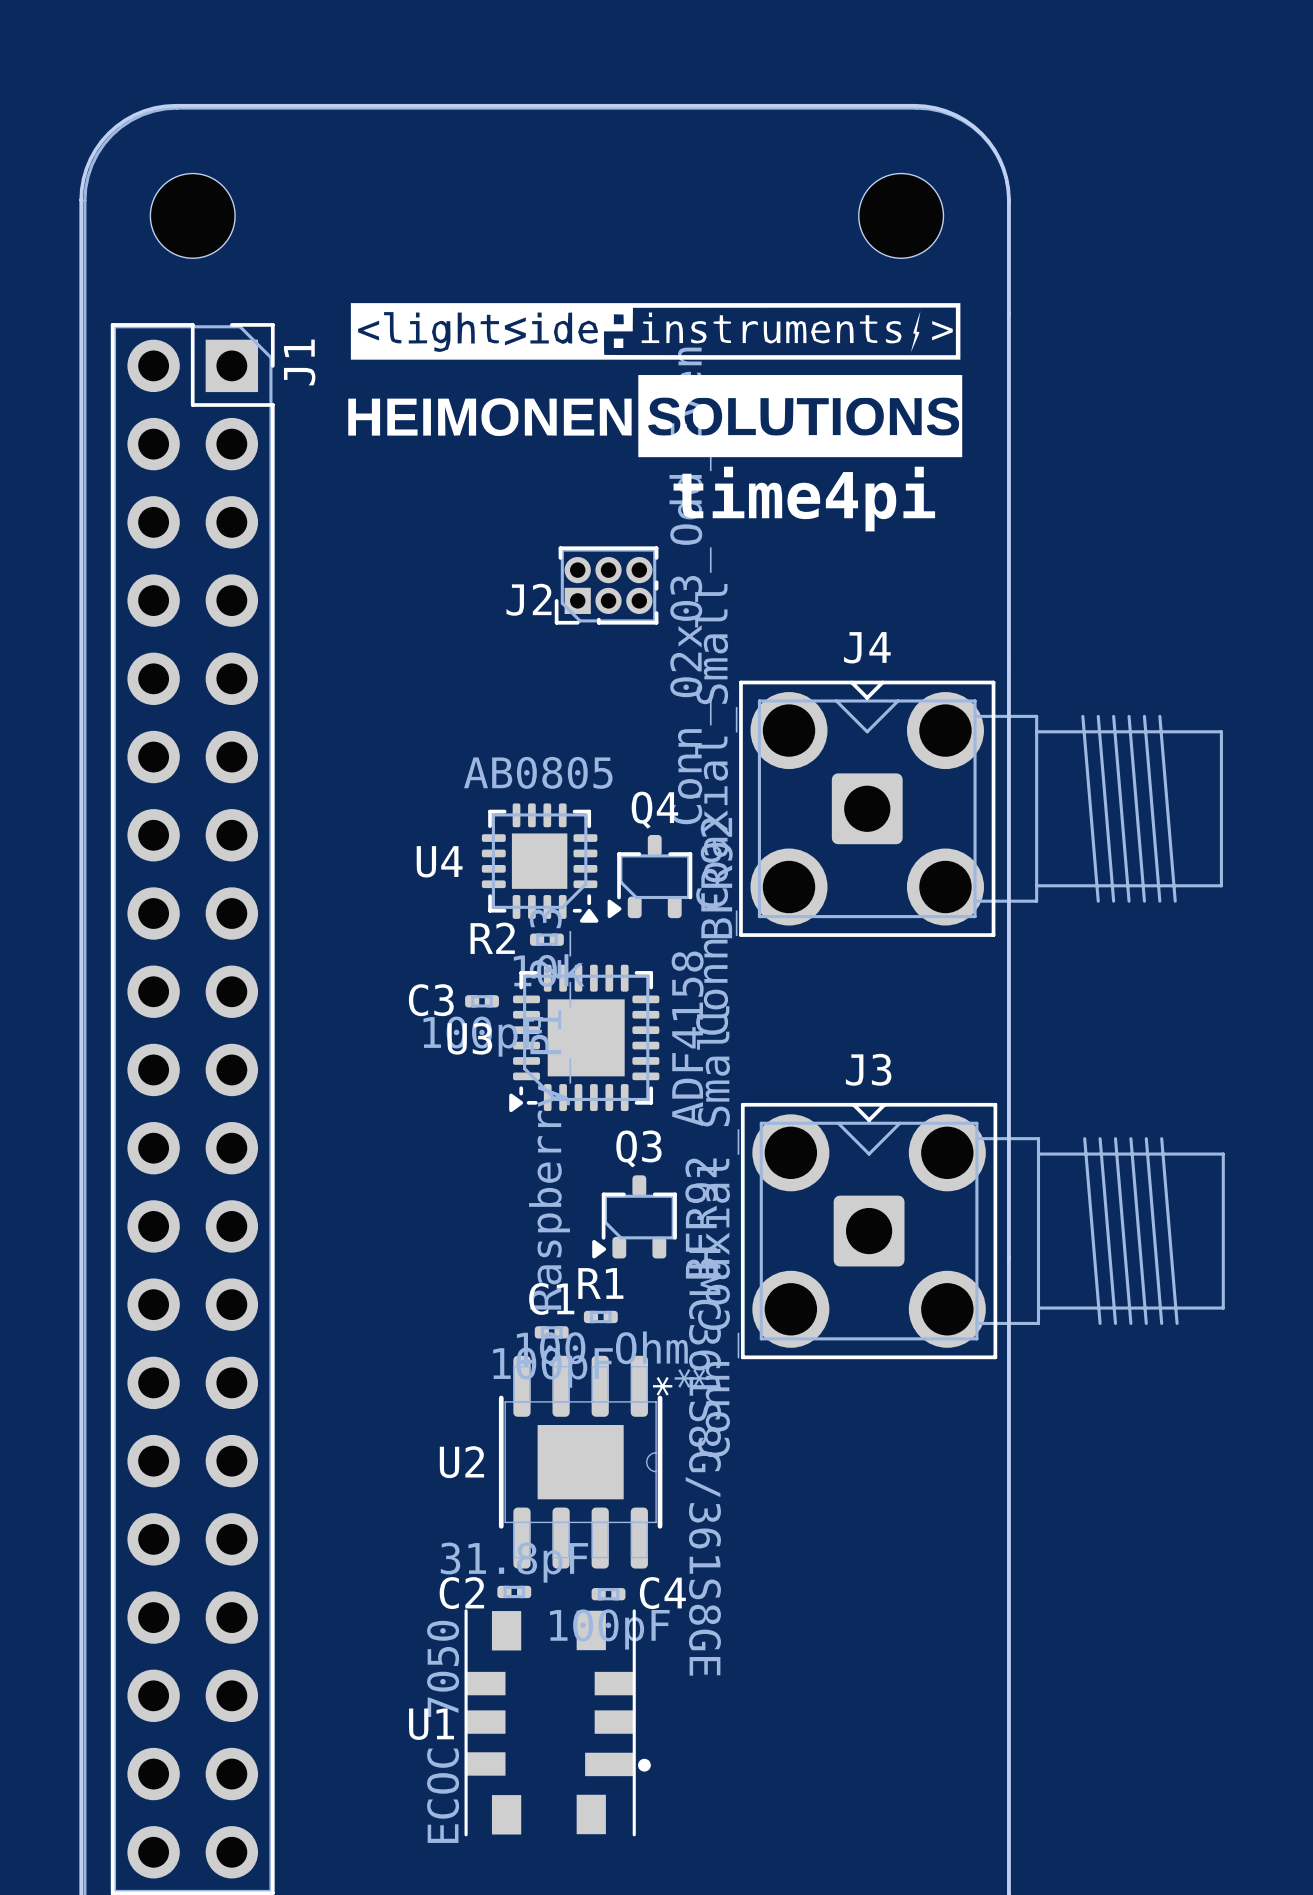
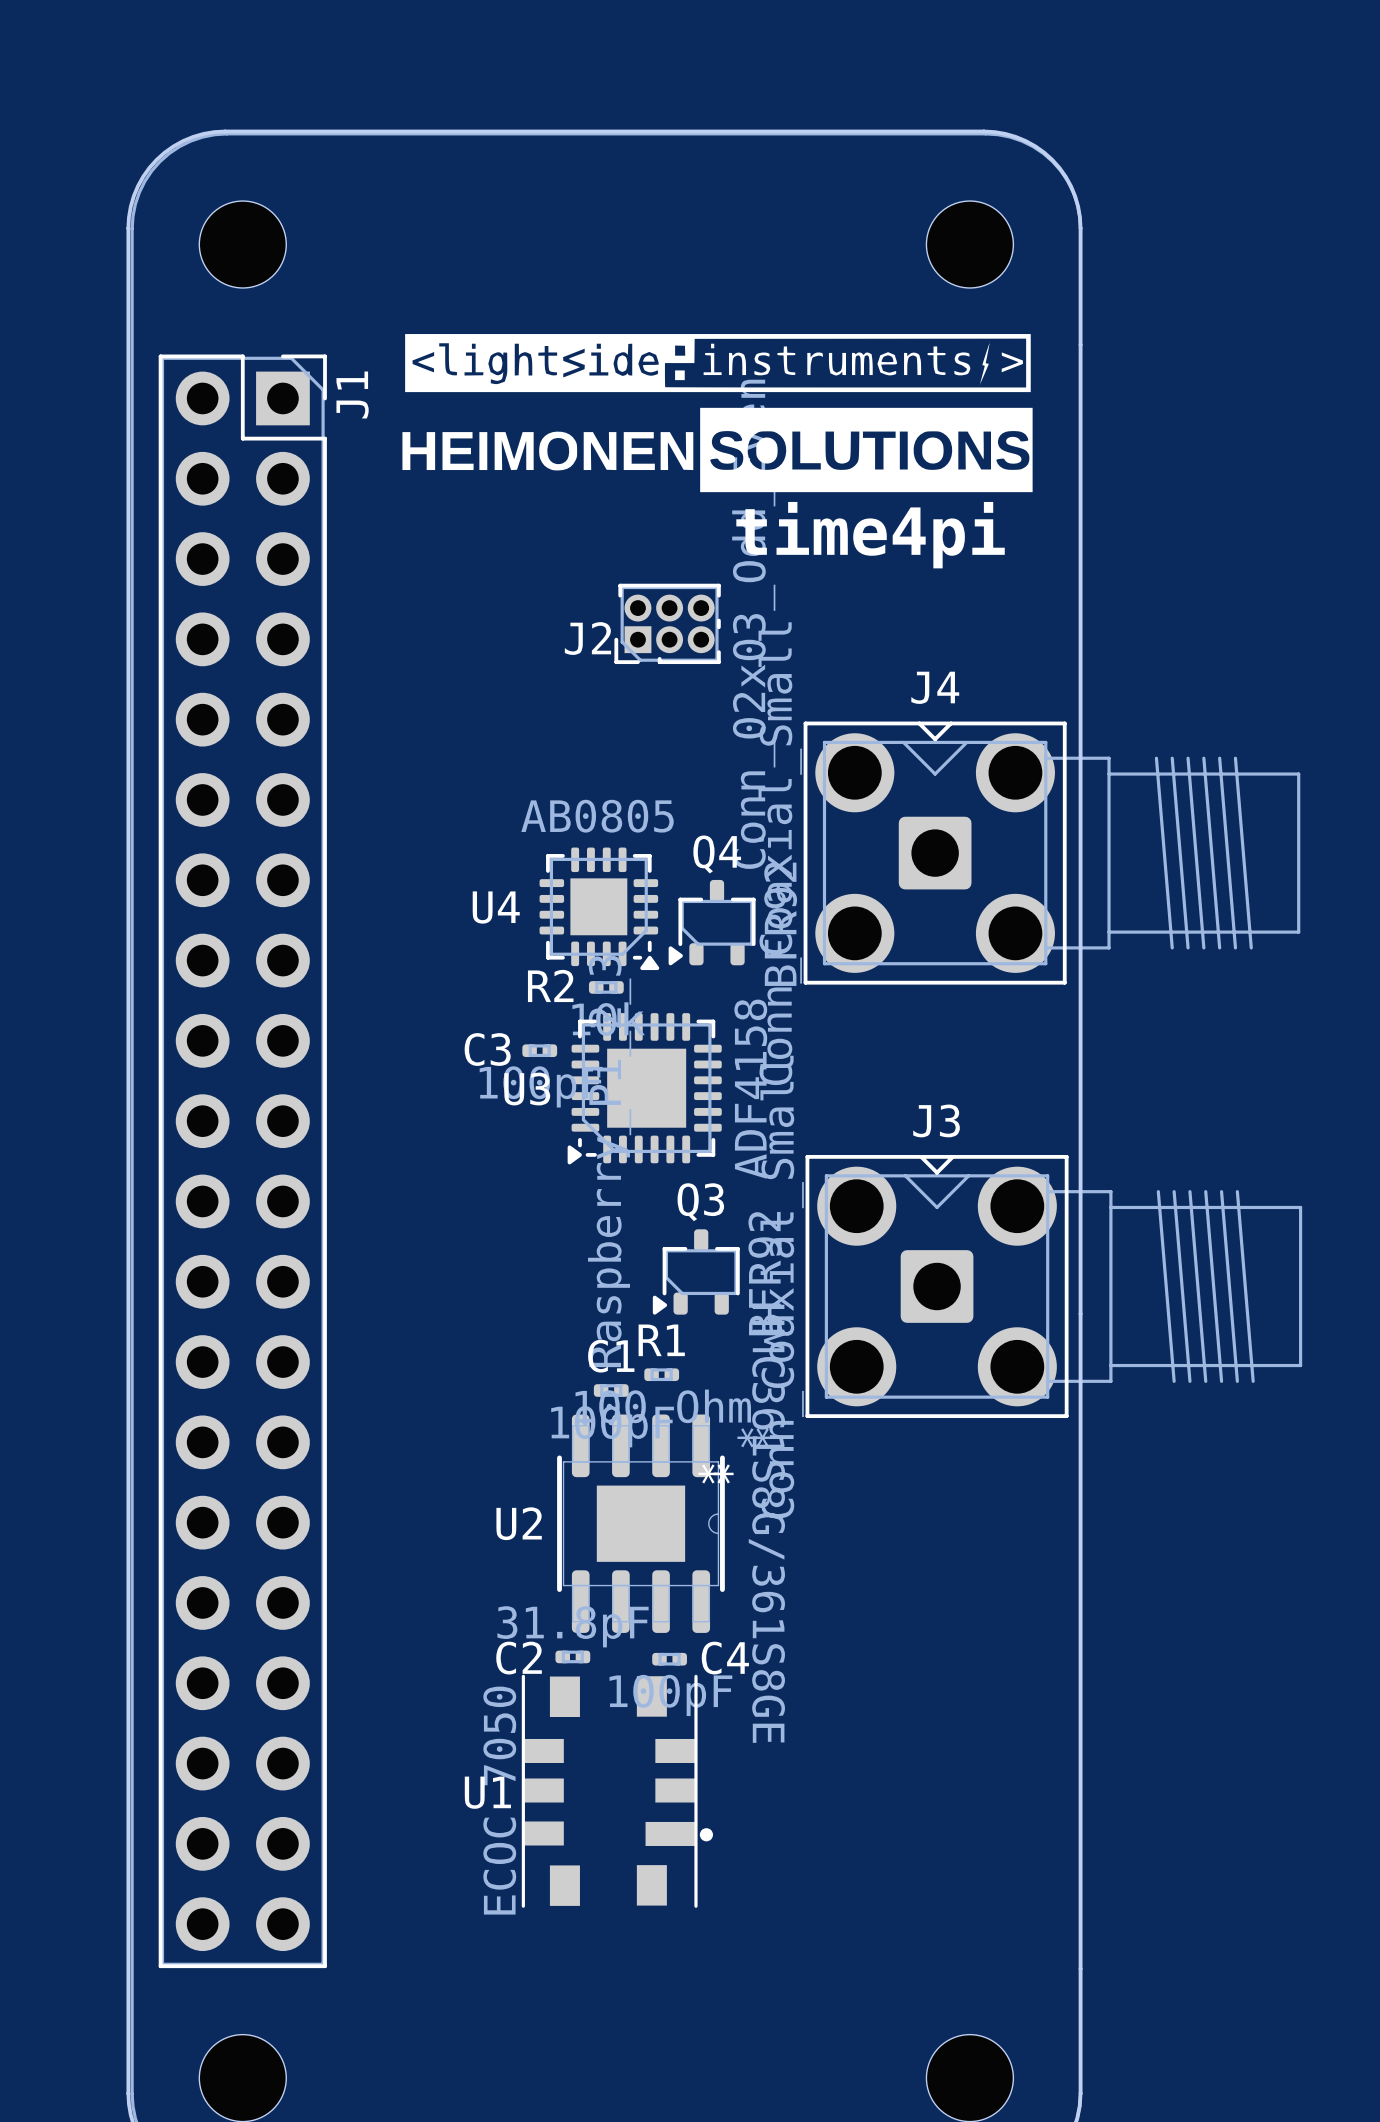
U2 footprint: [498, 1355, 663, 1569] -> [557, 1414, 725, 1633]

